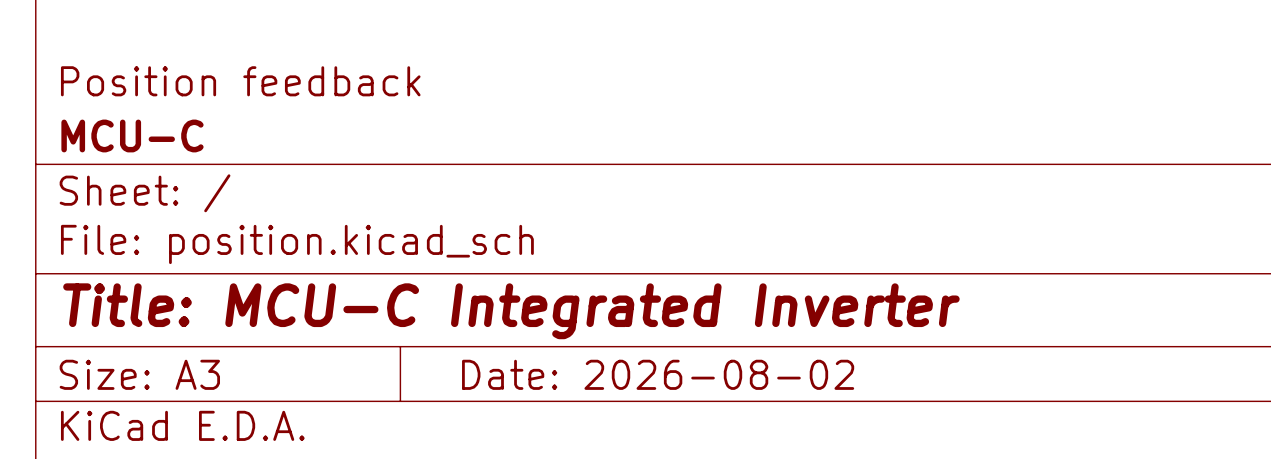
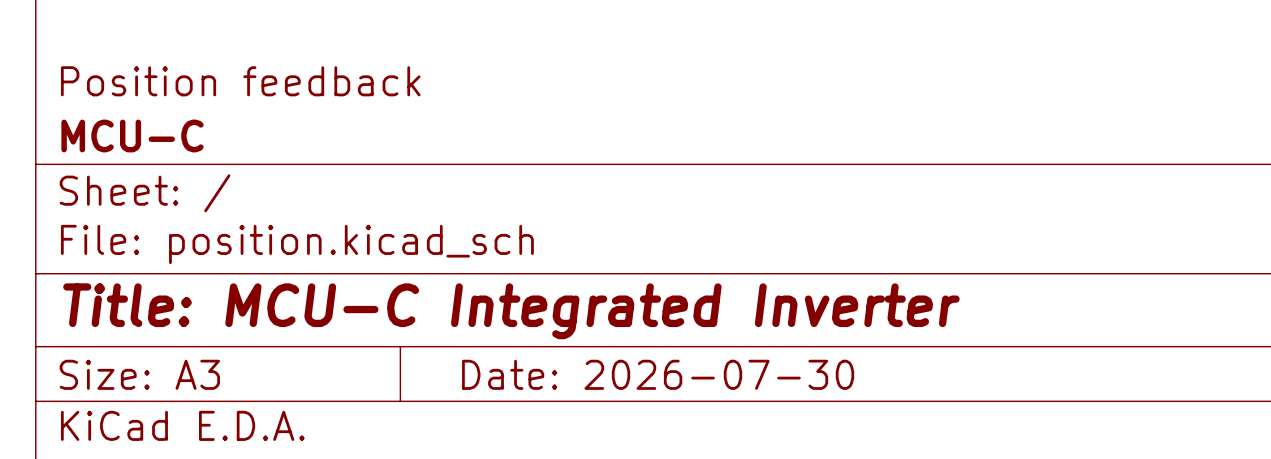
title block: Date: 2026-08-02 (658, 374) -> Date: 2026-07-30 (658, 374)

